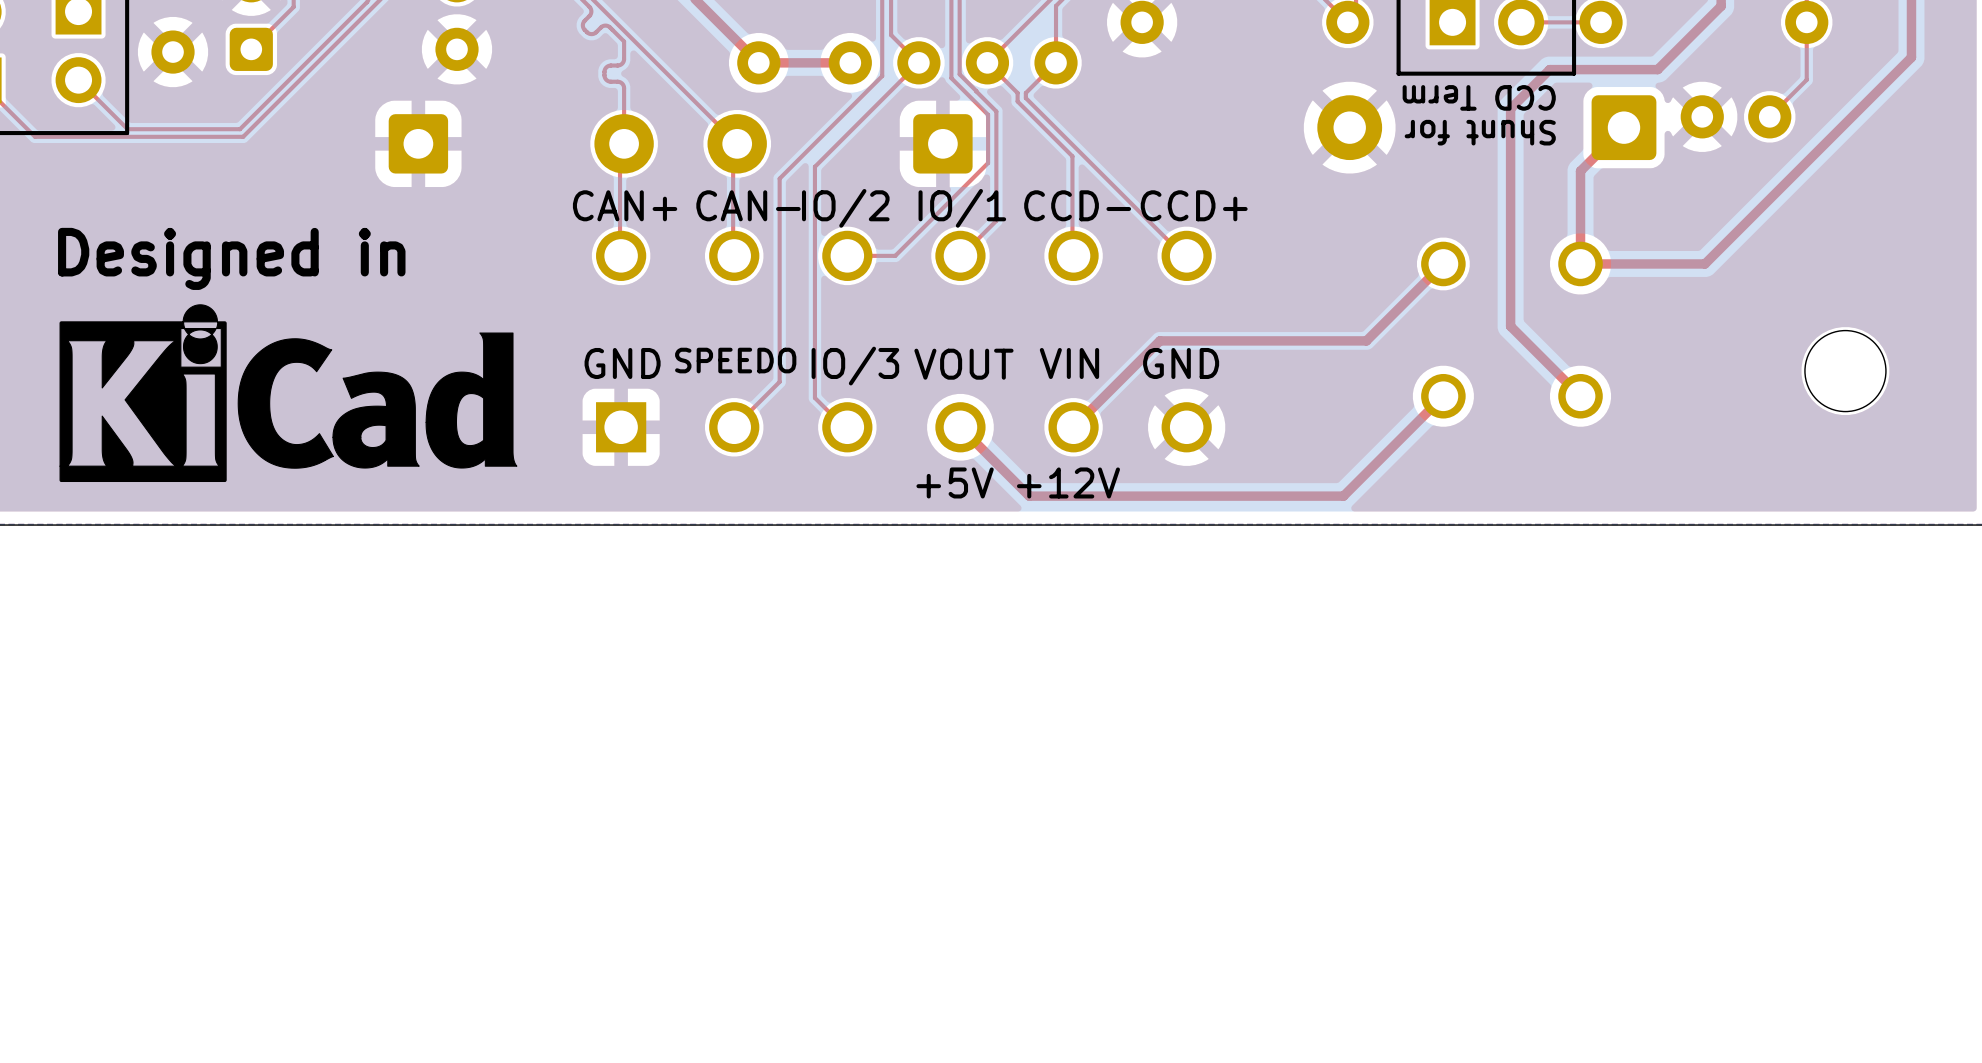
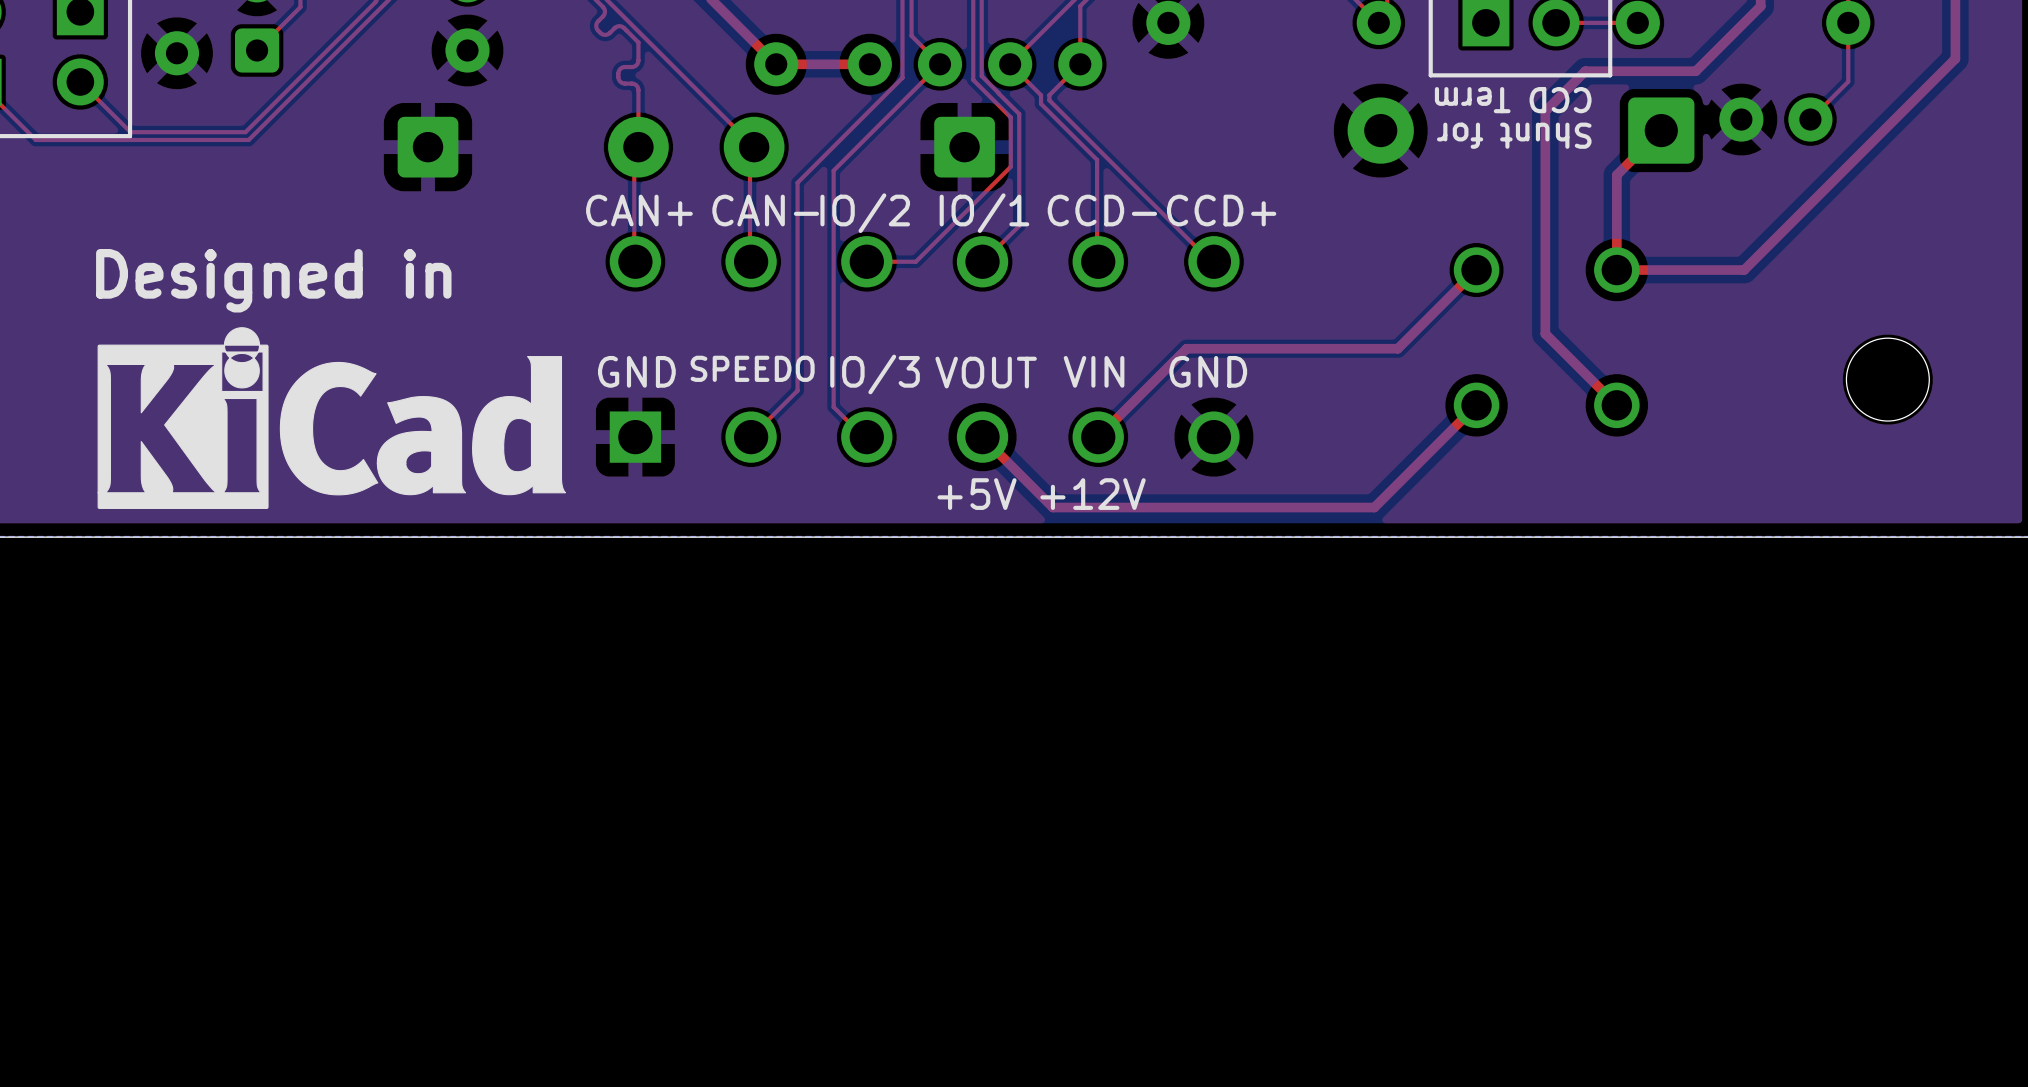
text position: Designed in (231, 258) -> Designed in (273, 280)
drawing position: (200, 313) -> (241, 336)
drawing position: (200, 346) -> (242, 369)
drawing position: (471, 400) -> (519, 425)
drawing position: (143, 401) -> (183, 426)
drawing position: (285, 403) -> (329, 428)
drawing position: (376, 420) -> (421, 445)

